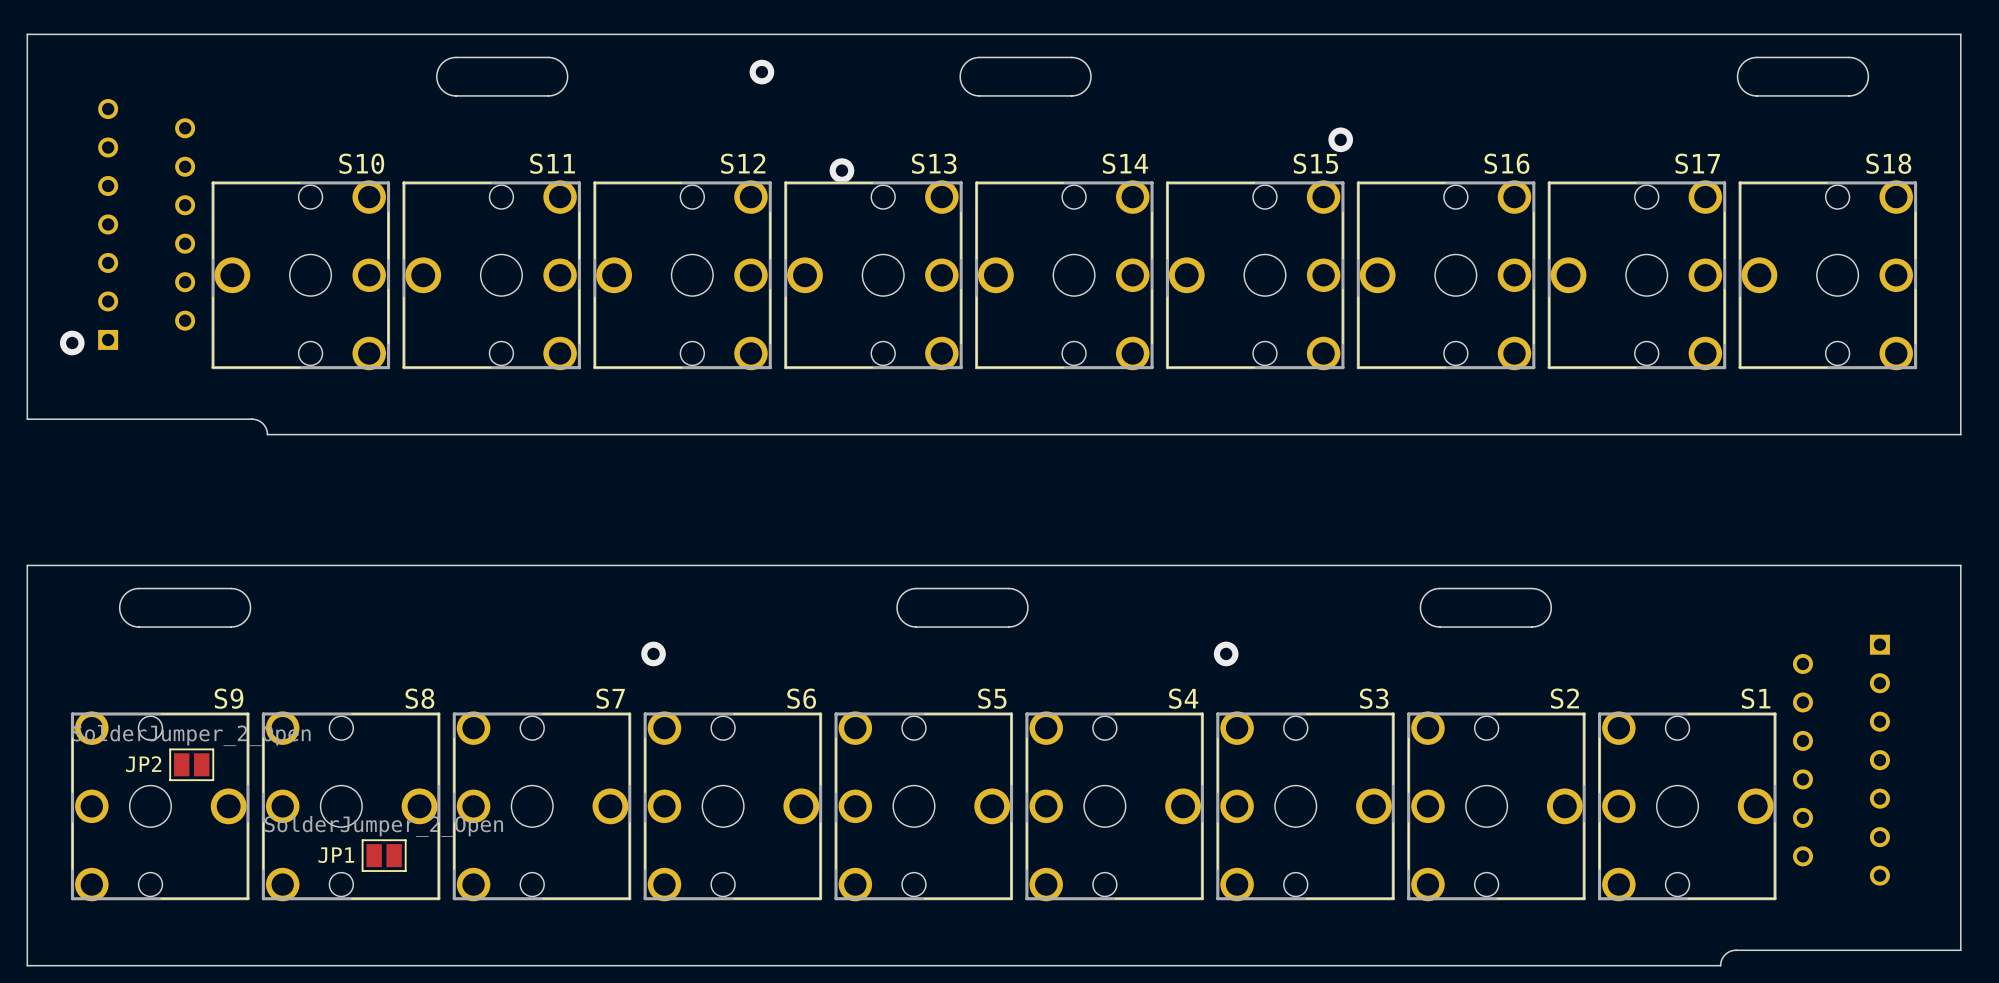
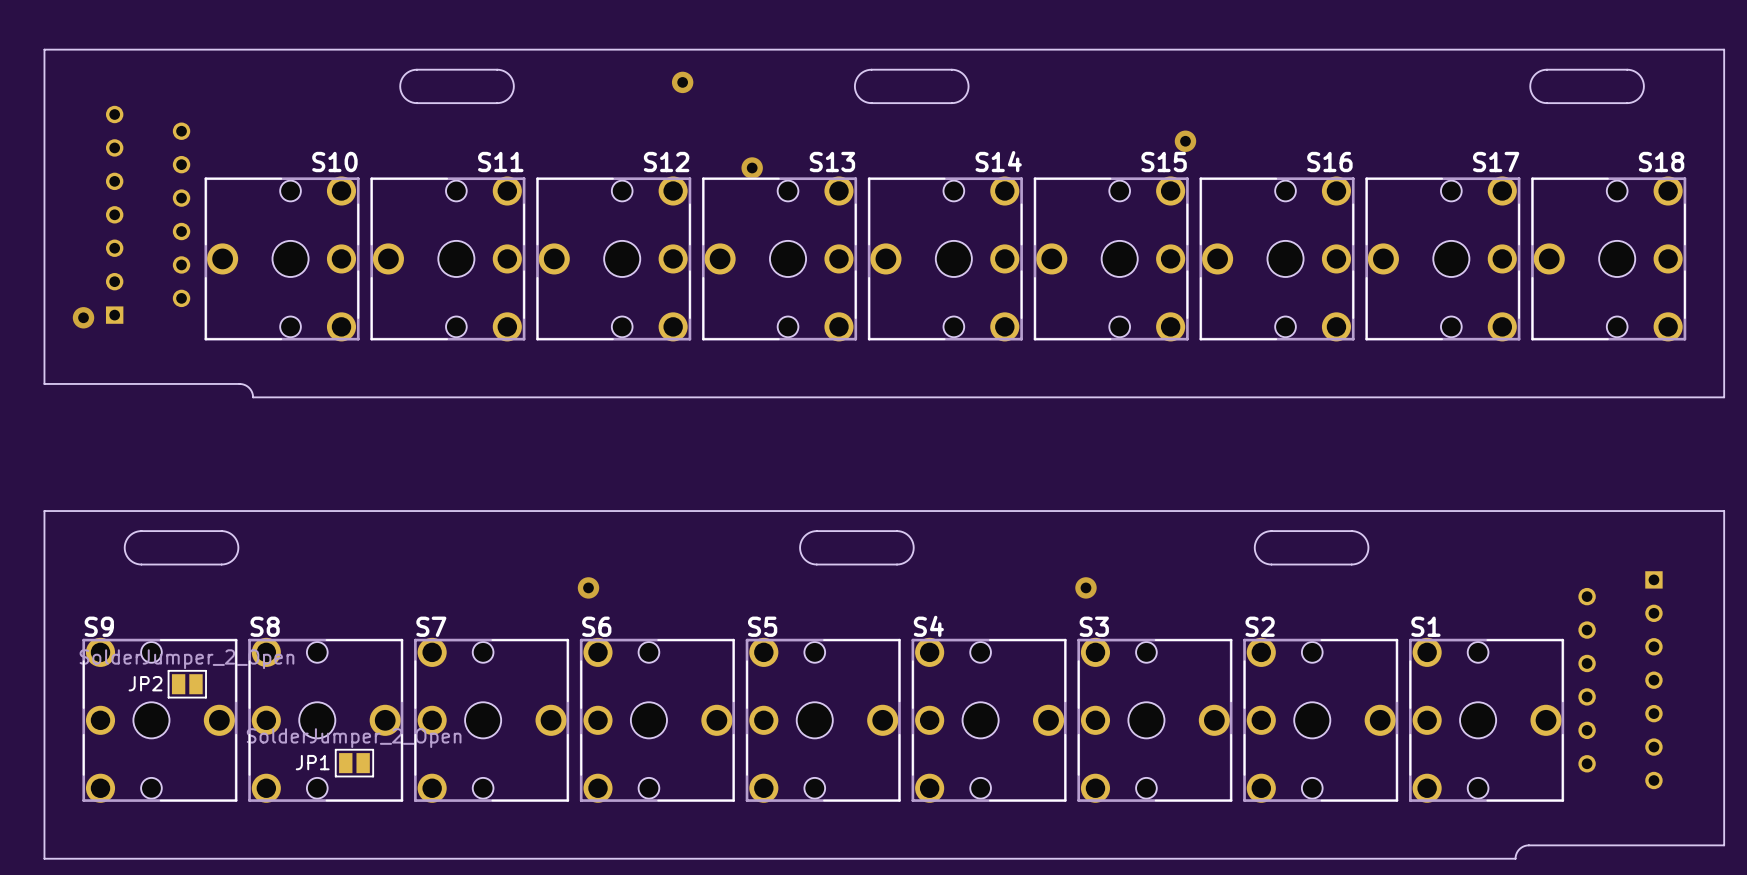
S9 name position: S9 (228, 698) -> S9 (99, 626)
S8 name position: S8 (419, 698) -> S8 (265, 626)
S7 name position: S7 (610, 698) -> S7 (431, 626)
S6 name position: S6 (801, 698) -> S6 (596, 626)
S5 name position: S5 (992, 698) -> S5 (762, 626)
S4 name position: S4 (1183, 698) -> S4 (928, 626)
S3 name position: S3 (1374, 698) -> S3 (1094, 626)
S2 name position: S2 (1564, 698) -> S2 (1260, 626)
S1 name position: S1 (1756, 698) -> S1 (1425, 626)

